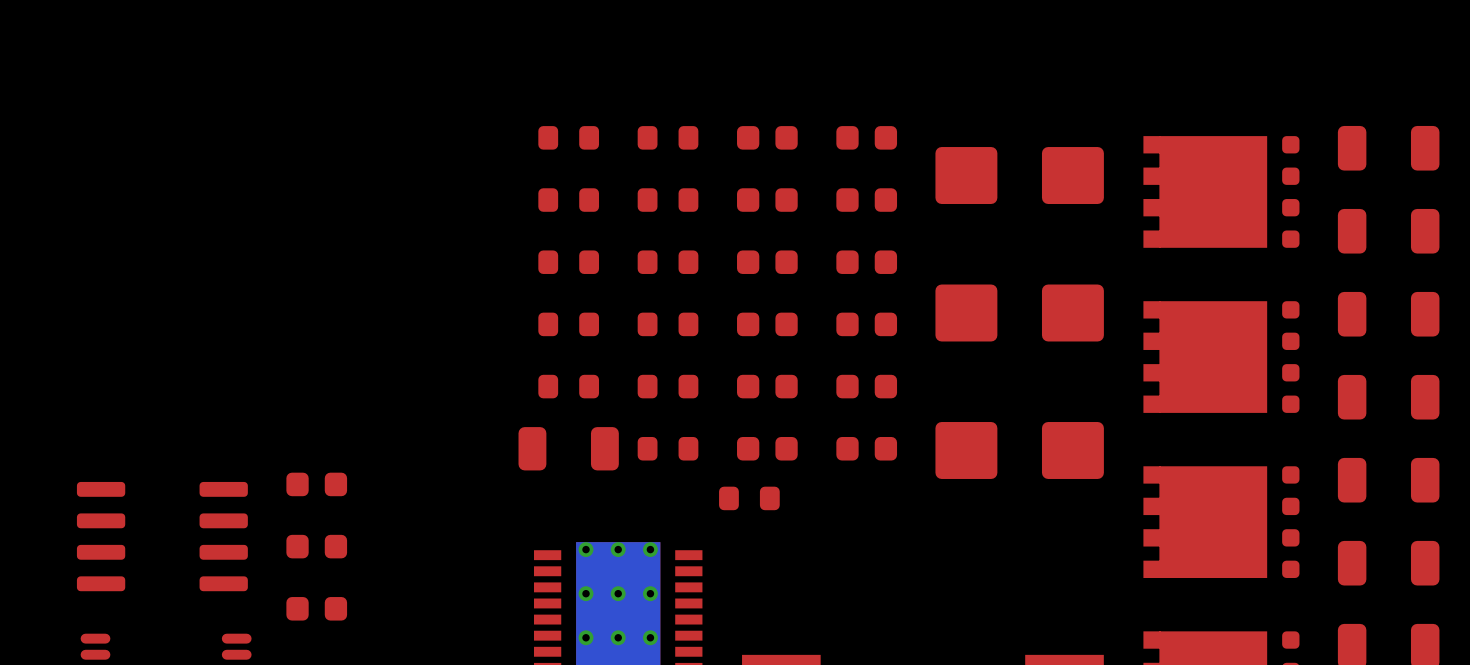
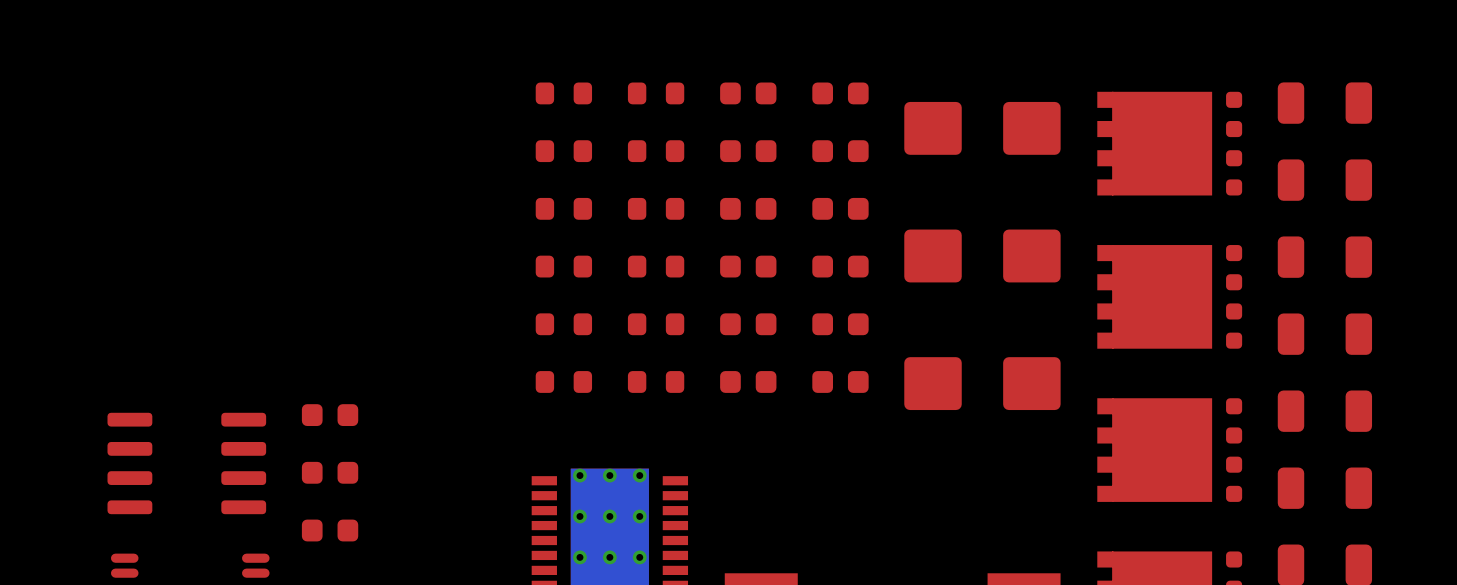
part footprint: [518, 427, 619, 471] -> [535, 371, 593, 393]
part: (749, 498) -> none

